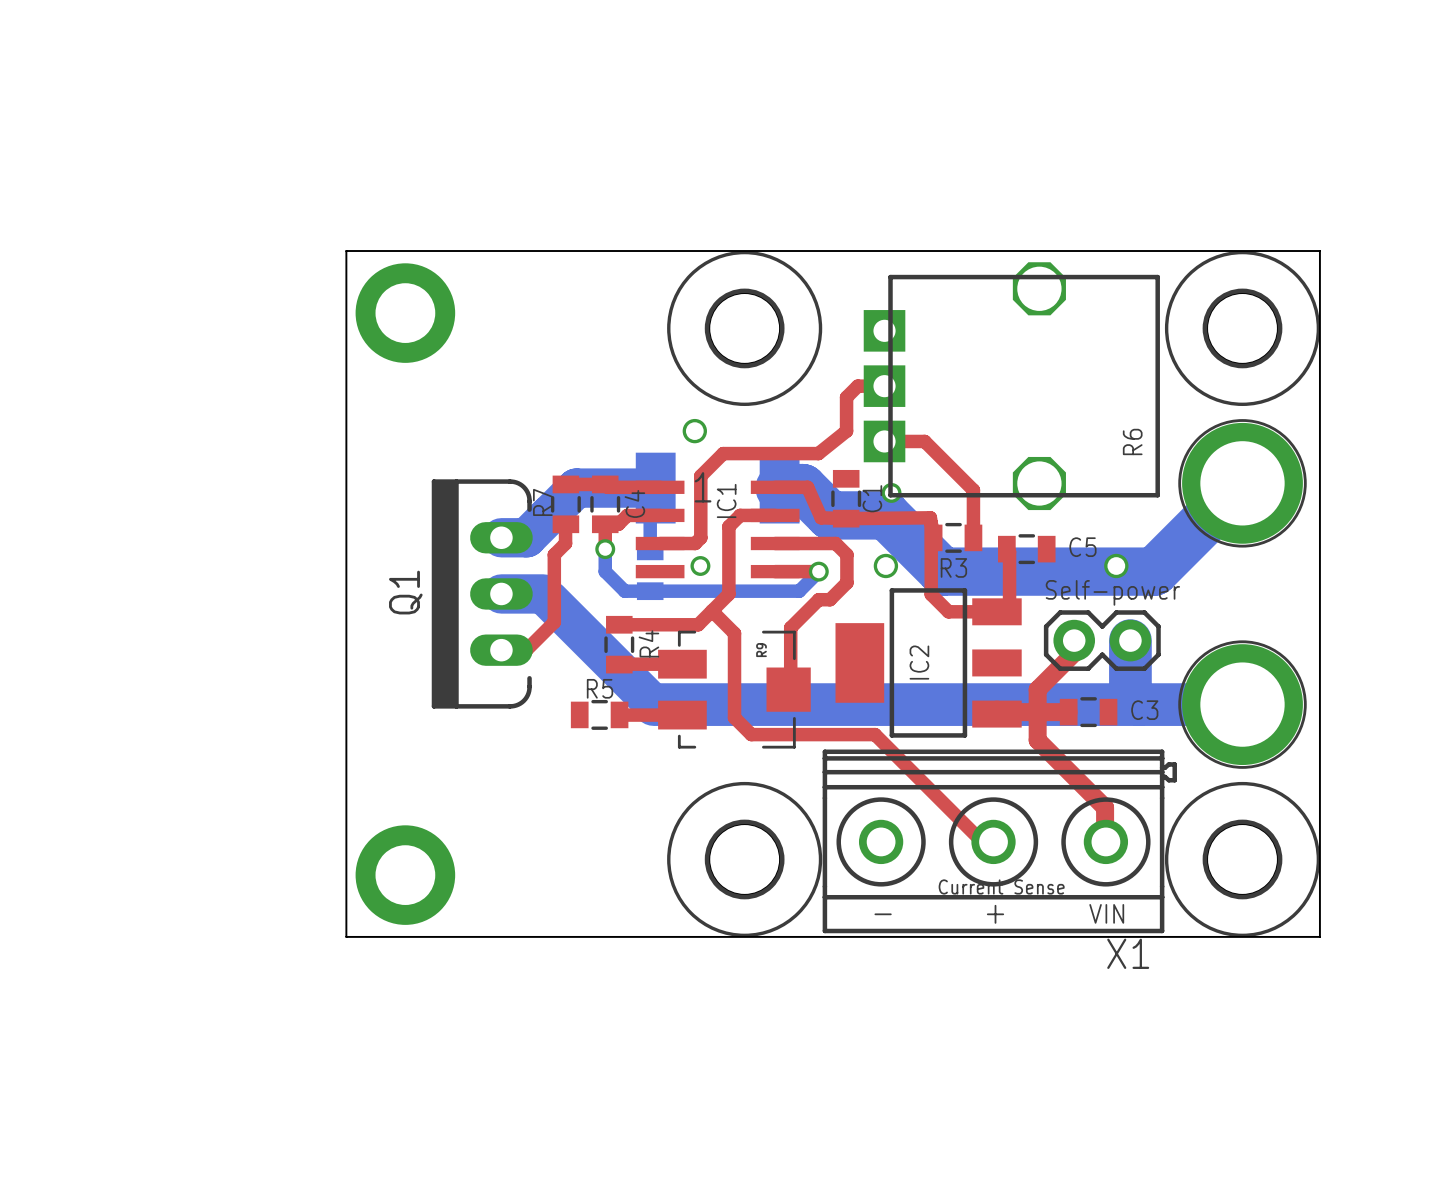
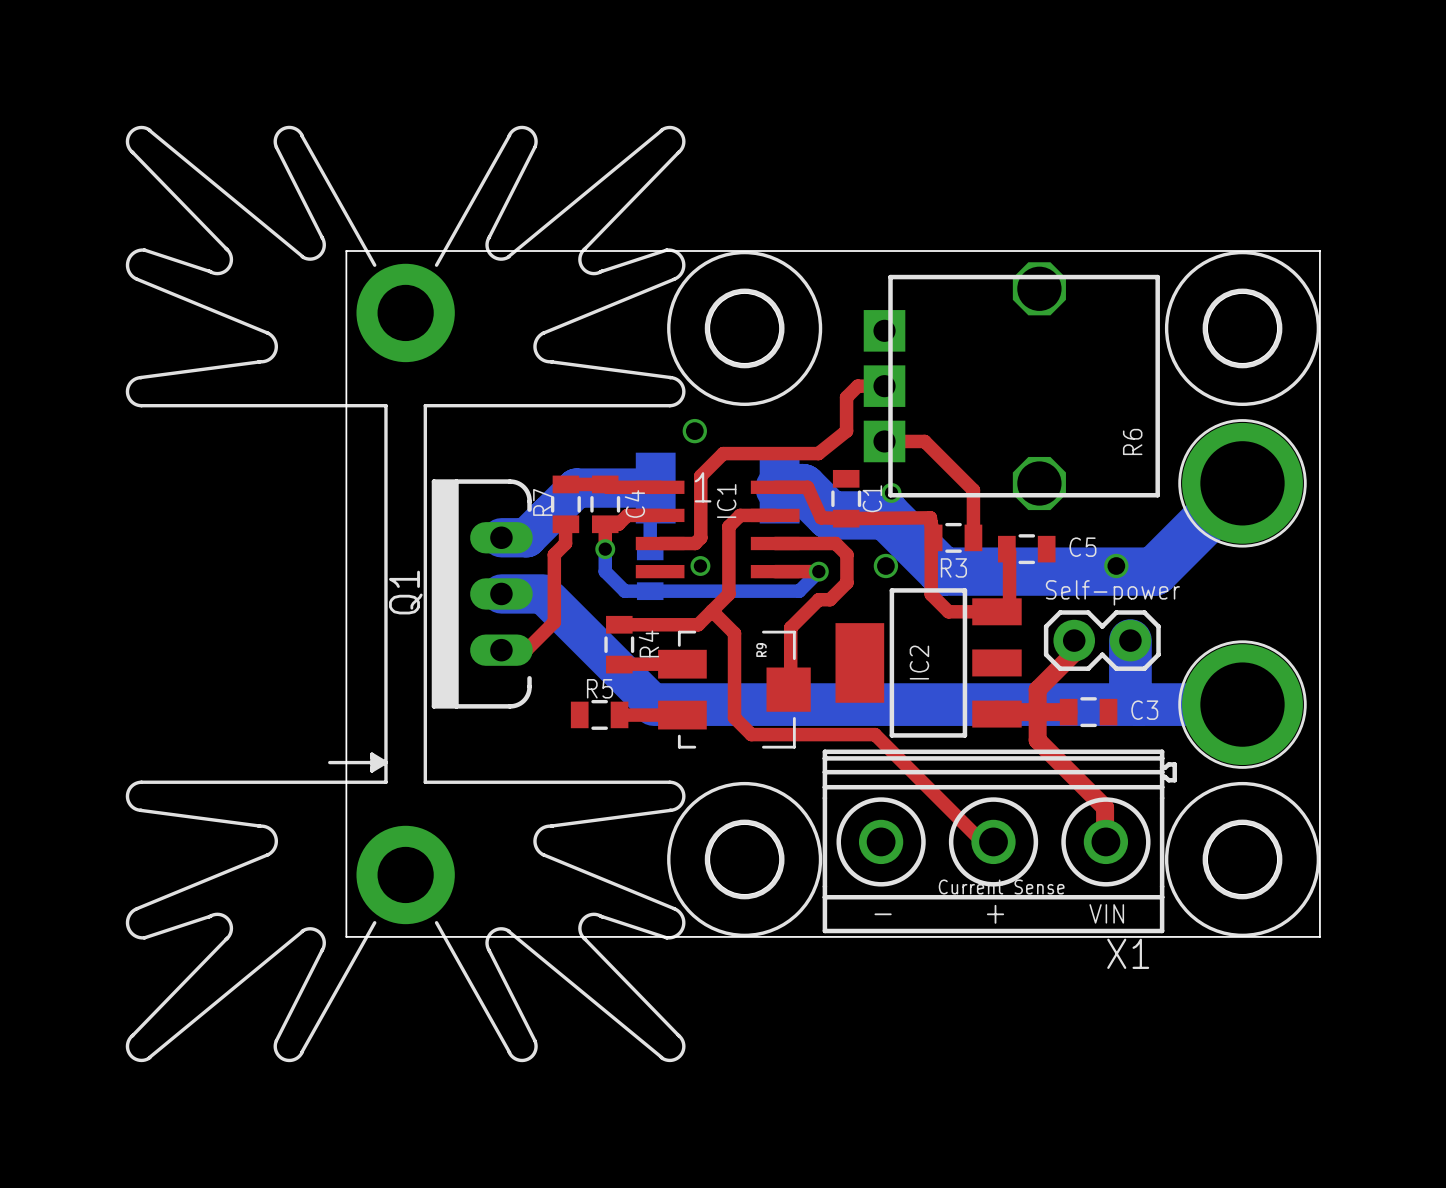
via: (405, 313) -> none
part: none -> (405, 593)
via: (405, 875) -> none

